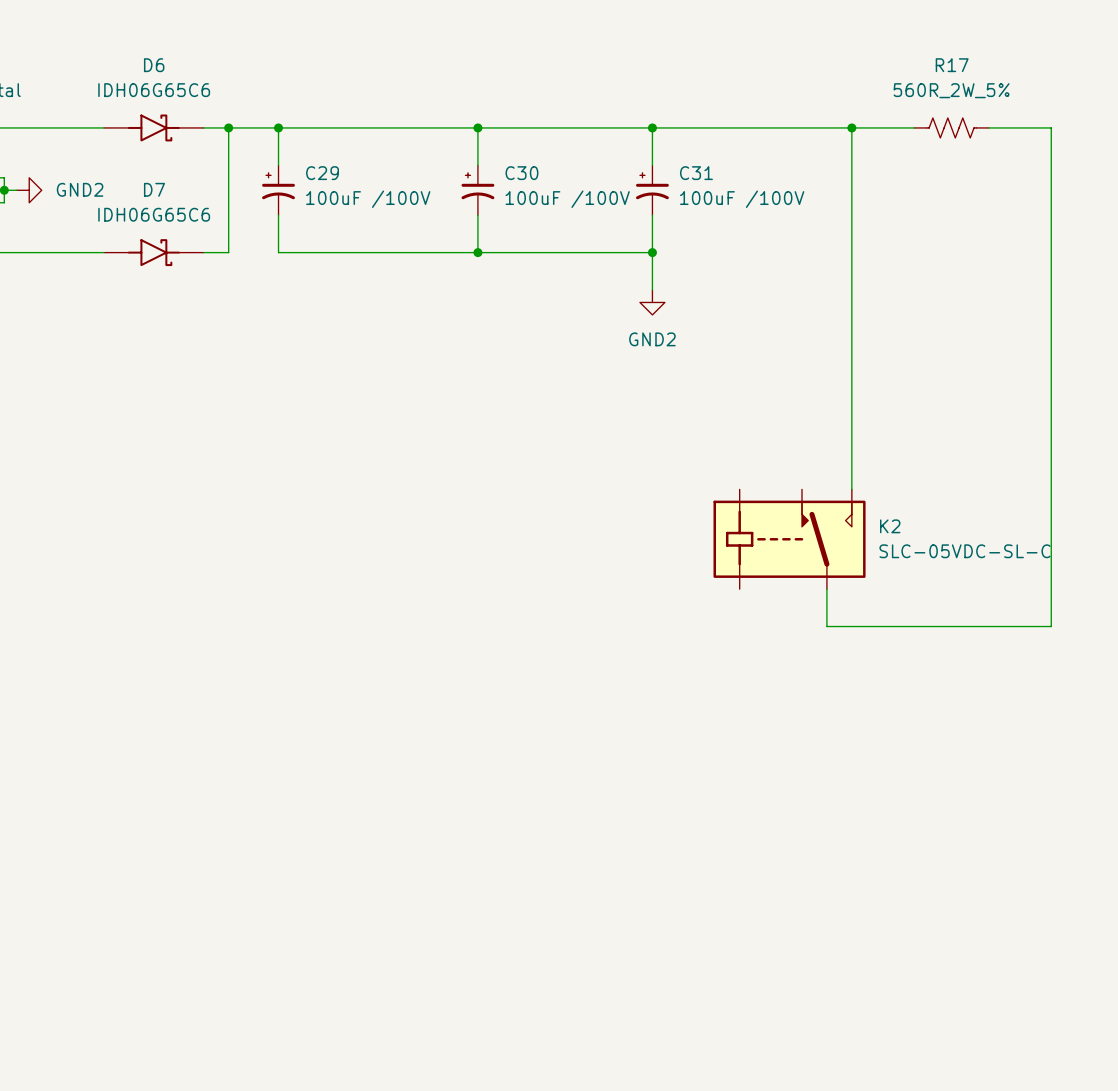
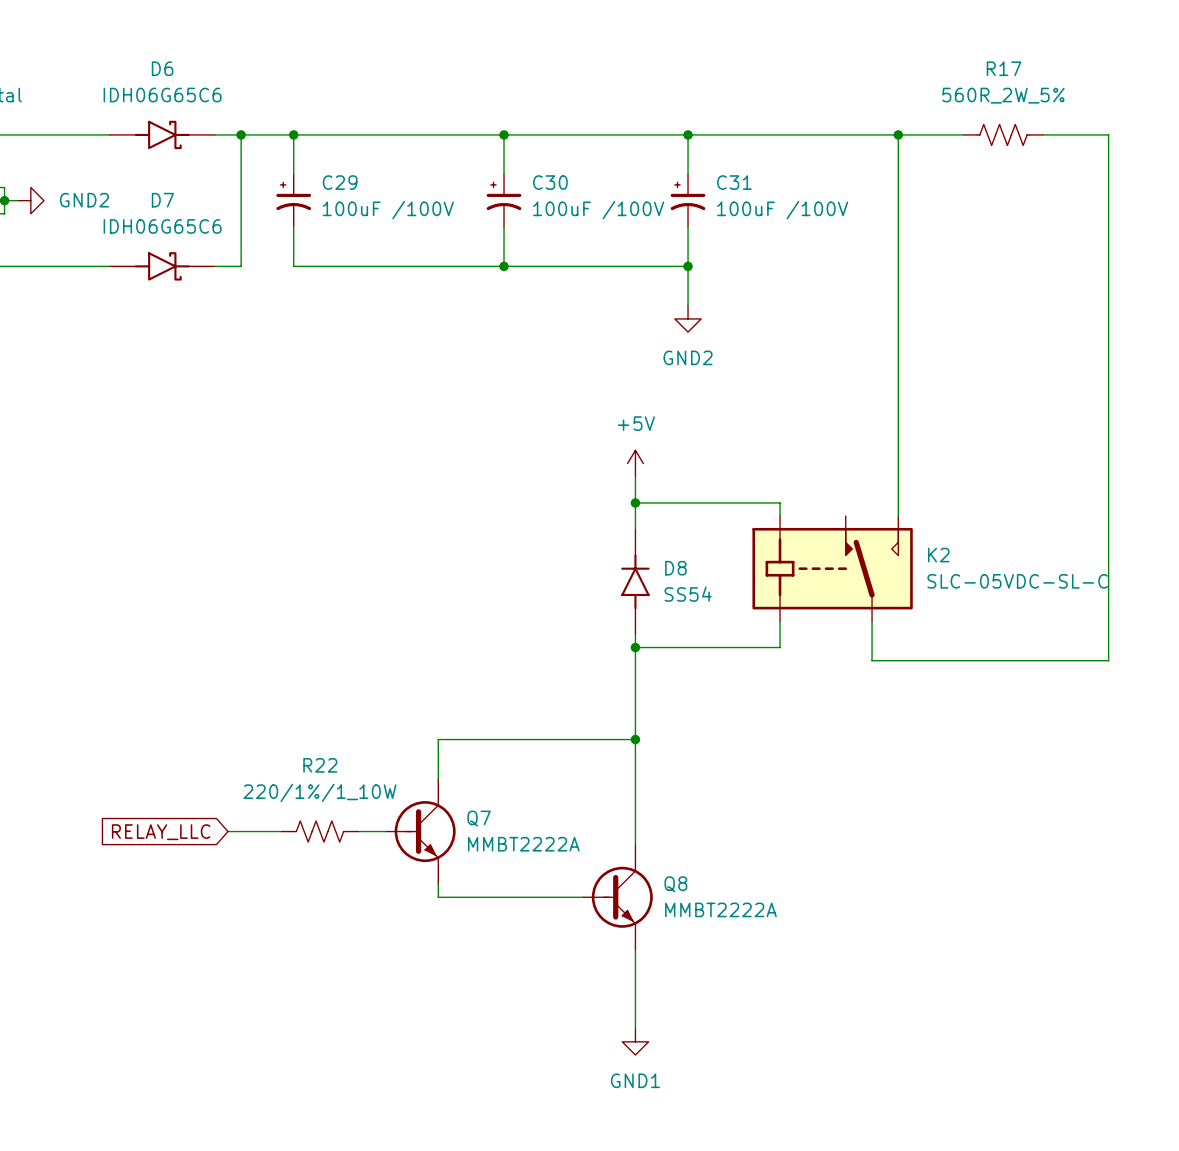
power symbol: none -> +5V (635, 463)
wire: none -> (635, 476) (635, 529)
wire: none -> (635, 502) (780, 502) (780, 516)
junction: none -> (635, 502)
D8: none -> SS54 (635, 581)
wire: none -> (780, 621) (780, 647) (635, 647)
wire: none -> (635, 634) (635, 844)
junction: none -> (635, 647)
wire: none -> (635, 739) (438, 739) (438, 778)
junction: none -> (635, 739)
wire: none -> (227, 831) (280, 831)
R22: none -> 220/1%/1_10W (319, 831)
wire: none -> (359, 831) (385, 831)
Q7: none -> MMBT2222A (420, 831)
global label: none -> RELAY_LLC (161, 832)
wire: none -> (438, 884) (438, 897) (582, 897)
Q8: none -> MMBT2222A (617, 897)
wire: none -> (635, 949) (635, 1028)
power symbol: none -> GND1 (635, 1041)

